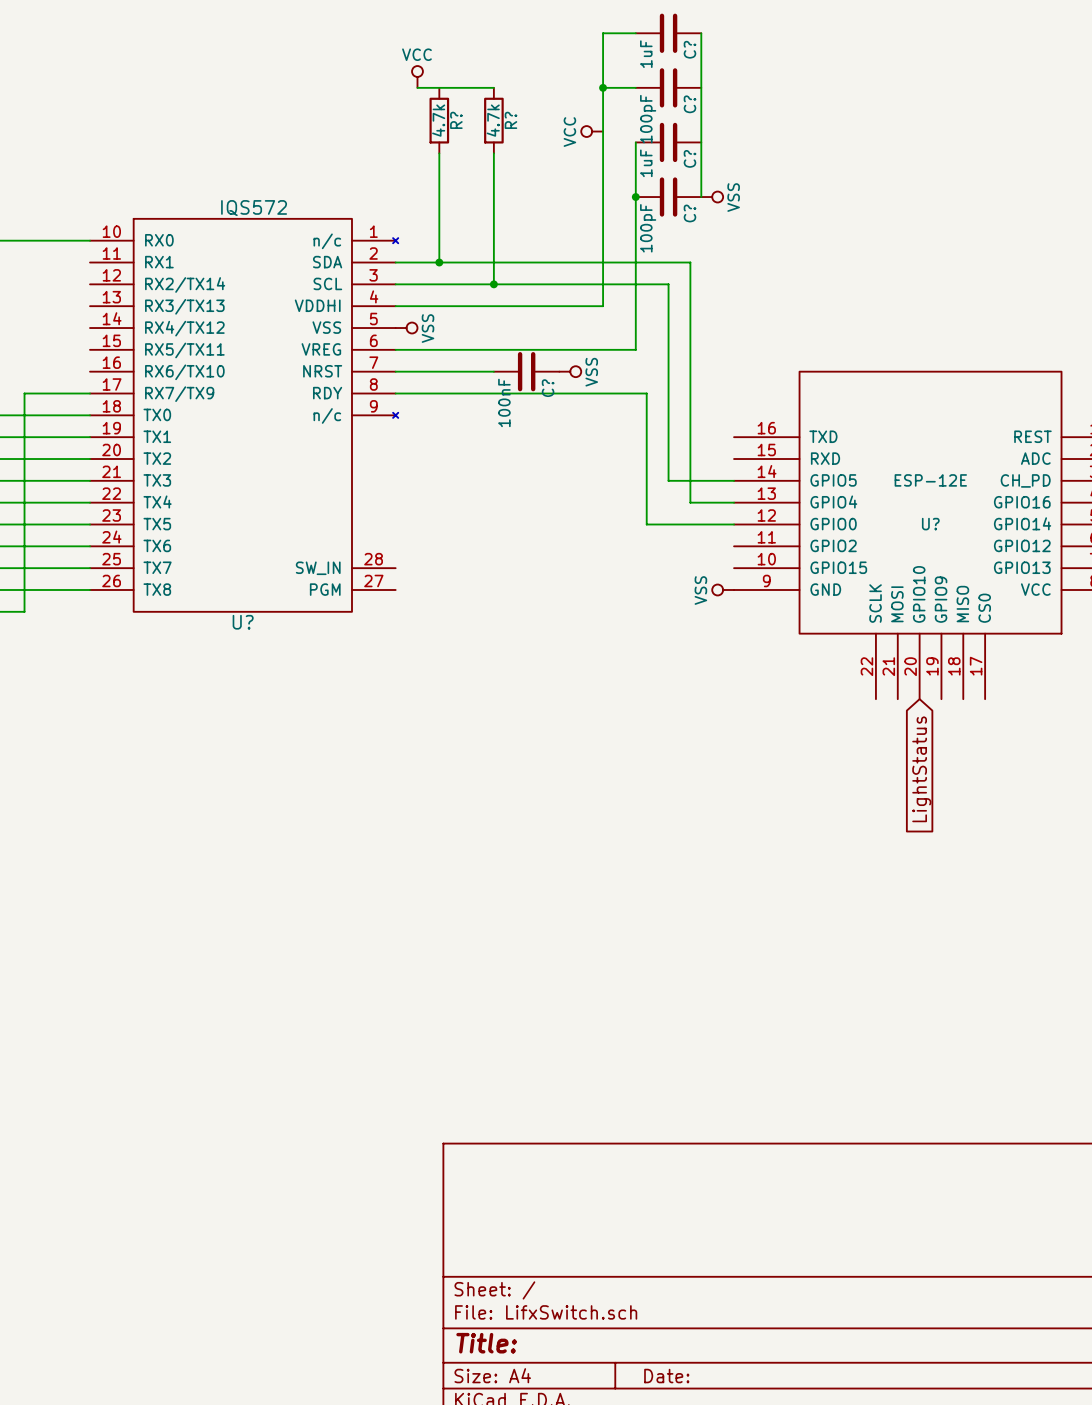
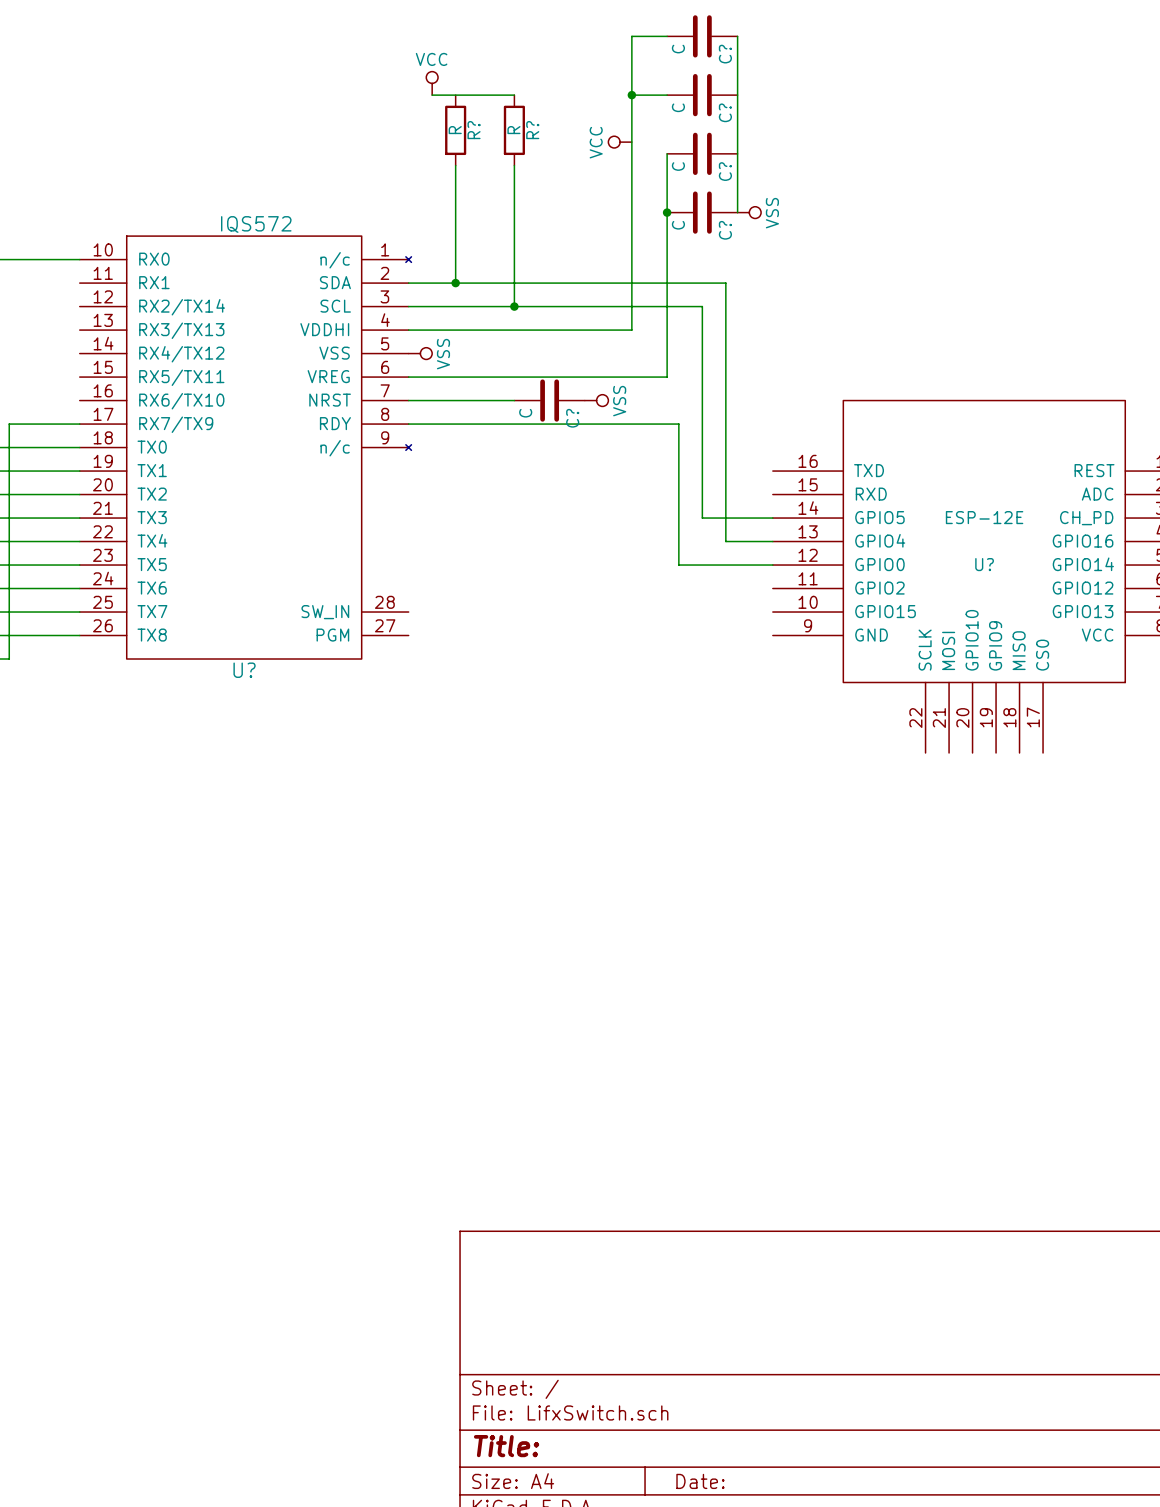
C? value: 1uF (646, 54) -> C (678, 49)
C? value: 100pF (648, 119) -> C (678, 107)
R? value: 4.7k (438, 120) -> R (455, 130)
R? value: 4.7k (493, 120) -> R (513, 130)
C? value: 1uF (646, 163) -> C (678, 166)
C? value: 100pF (648, 228) -> C (678, 225)
C? value: 100nF (504, 402) -> C (525, 413)
power symbol: VSS (723, 589) -> none
global label: LightStatus (921, 769) -> none

